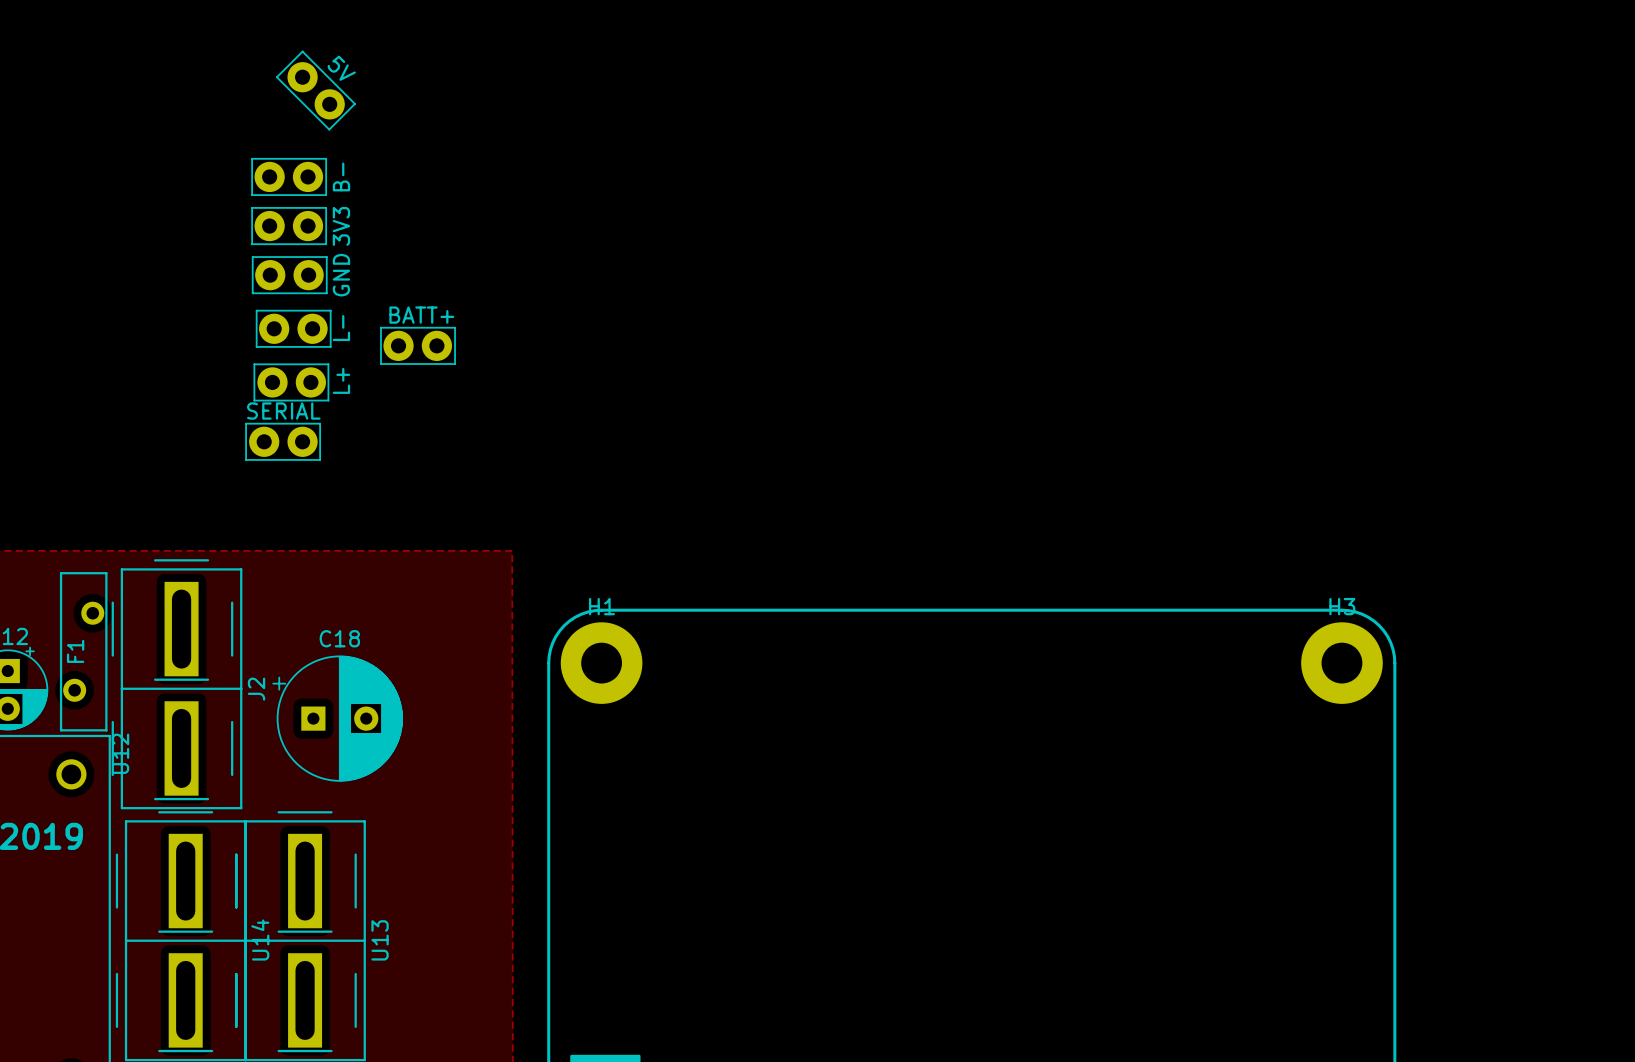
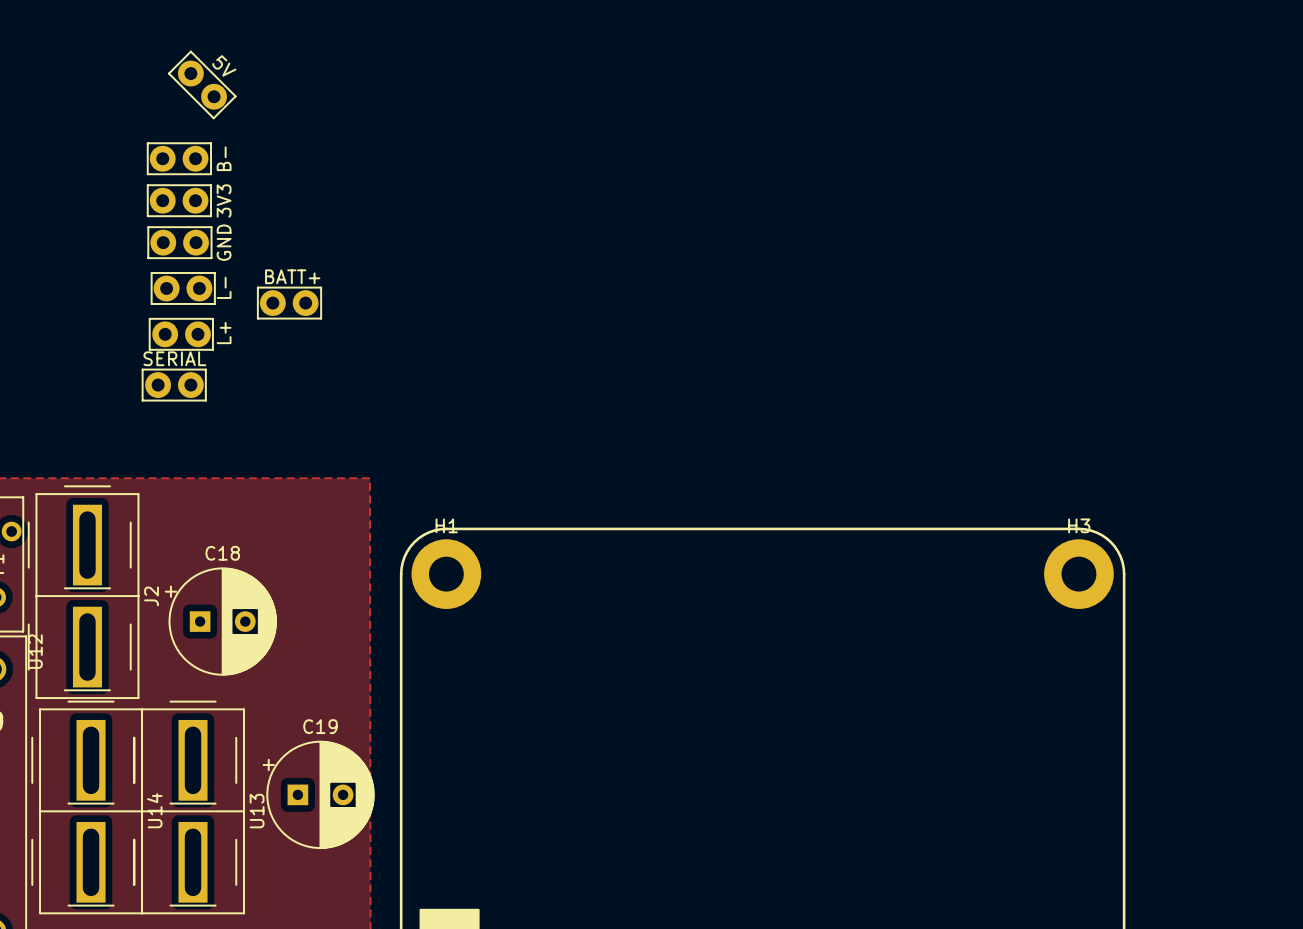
C19: none -> (318, 794)

